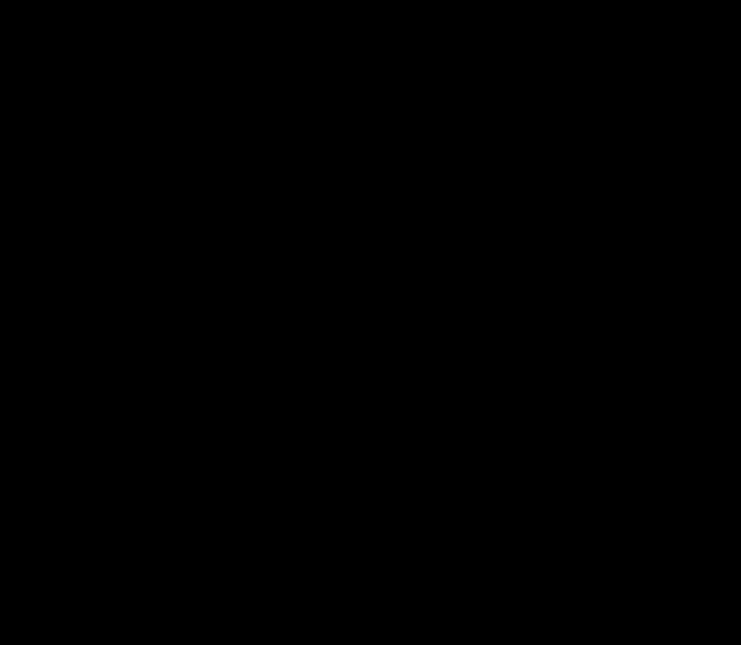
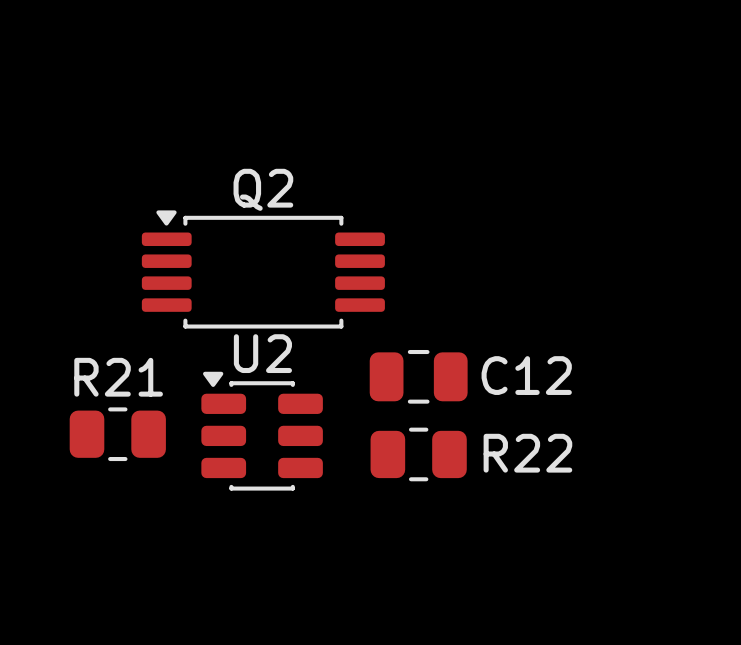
Q2: none -> (263, 269)
C12: none -> (418, 376)
U2: none -> (262, 431)
R21: none -> (117, 434)
R22: none -> (418, 454)

